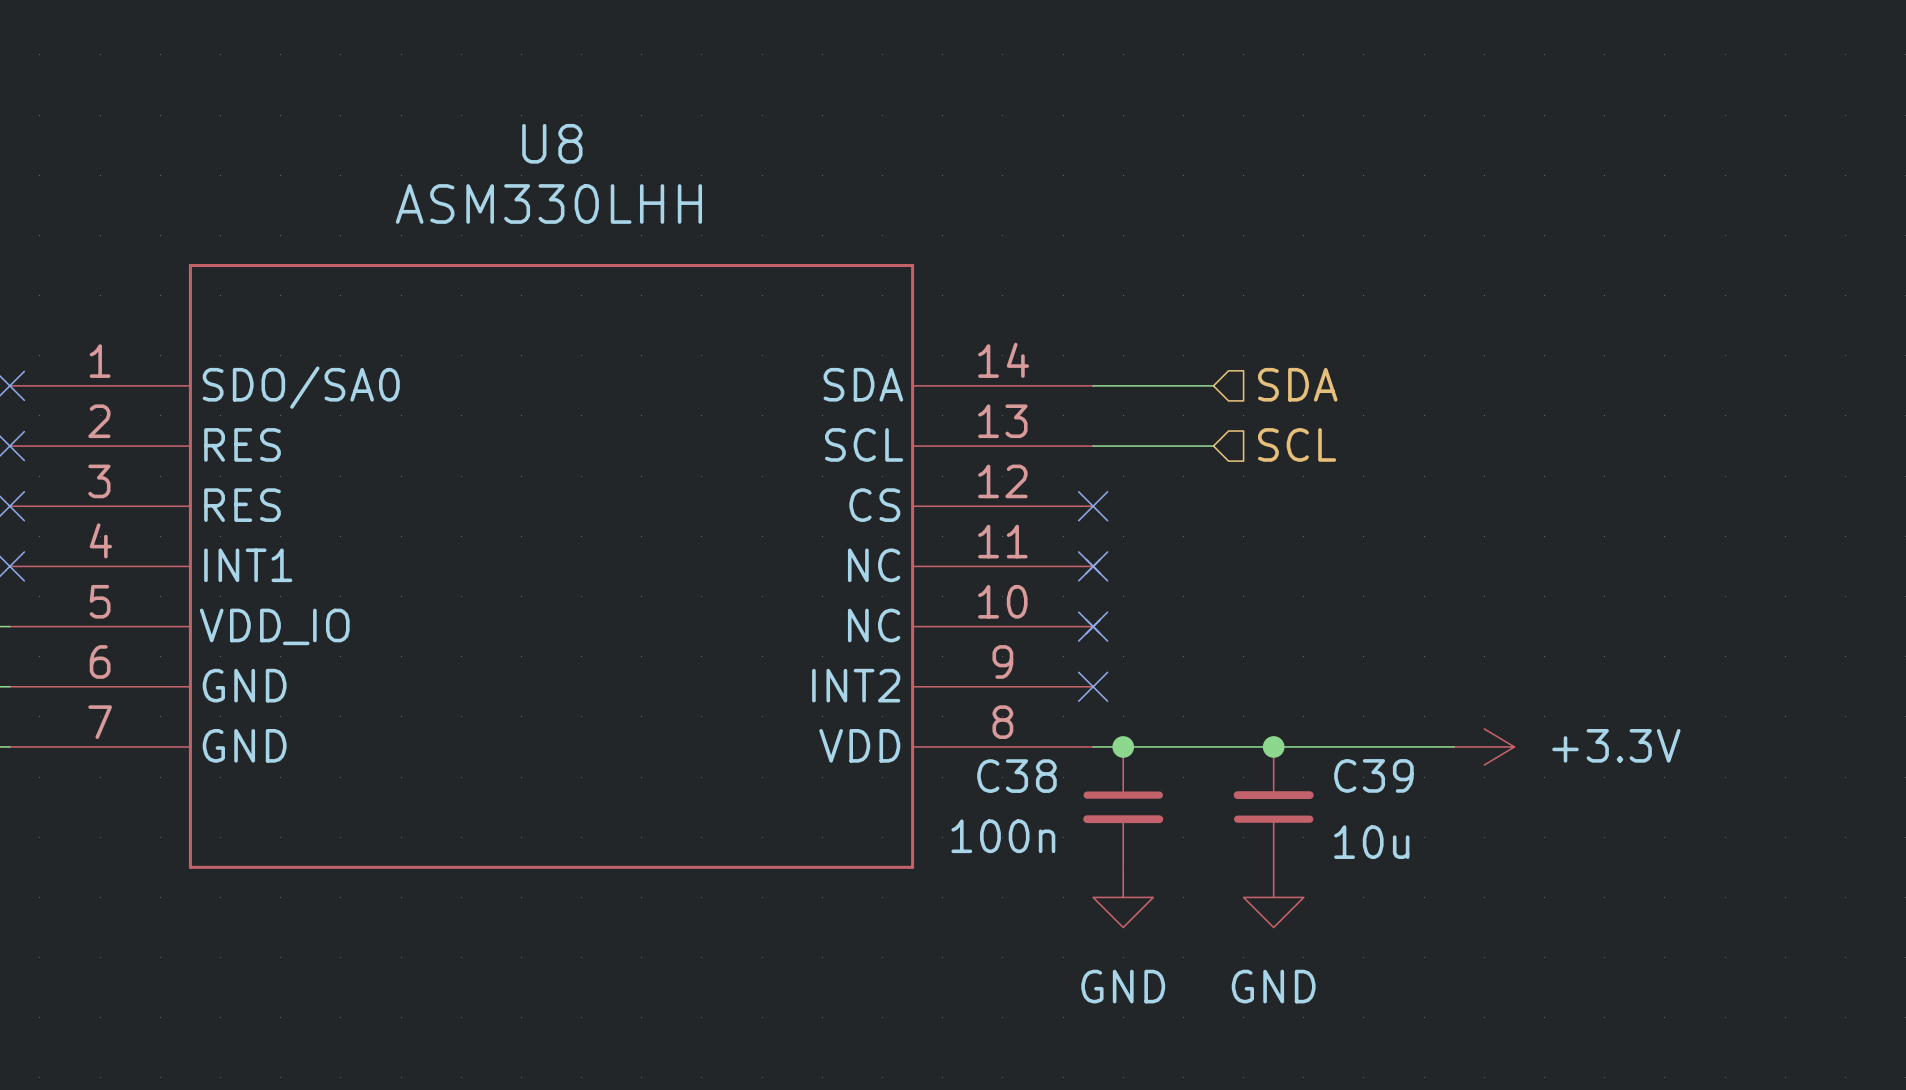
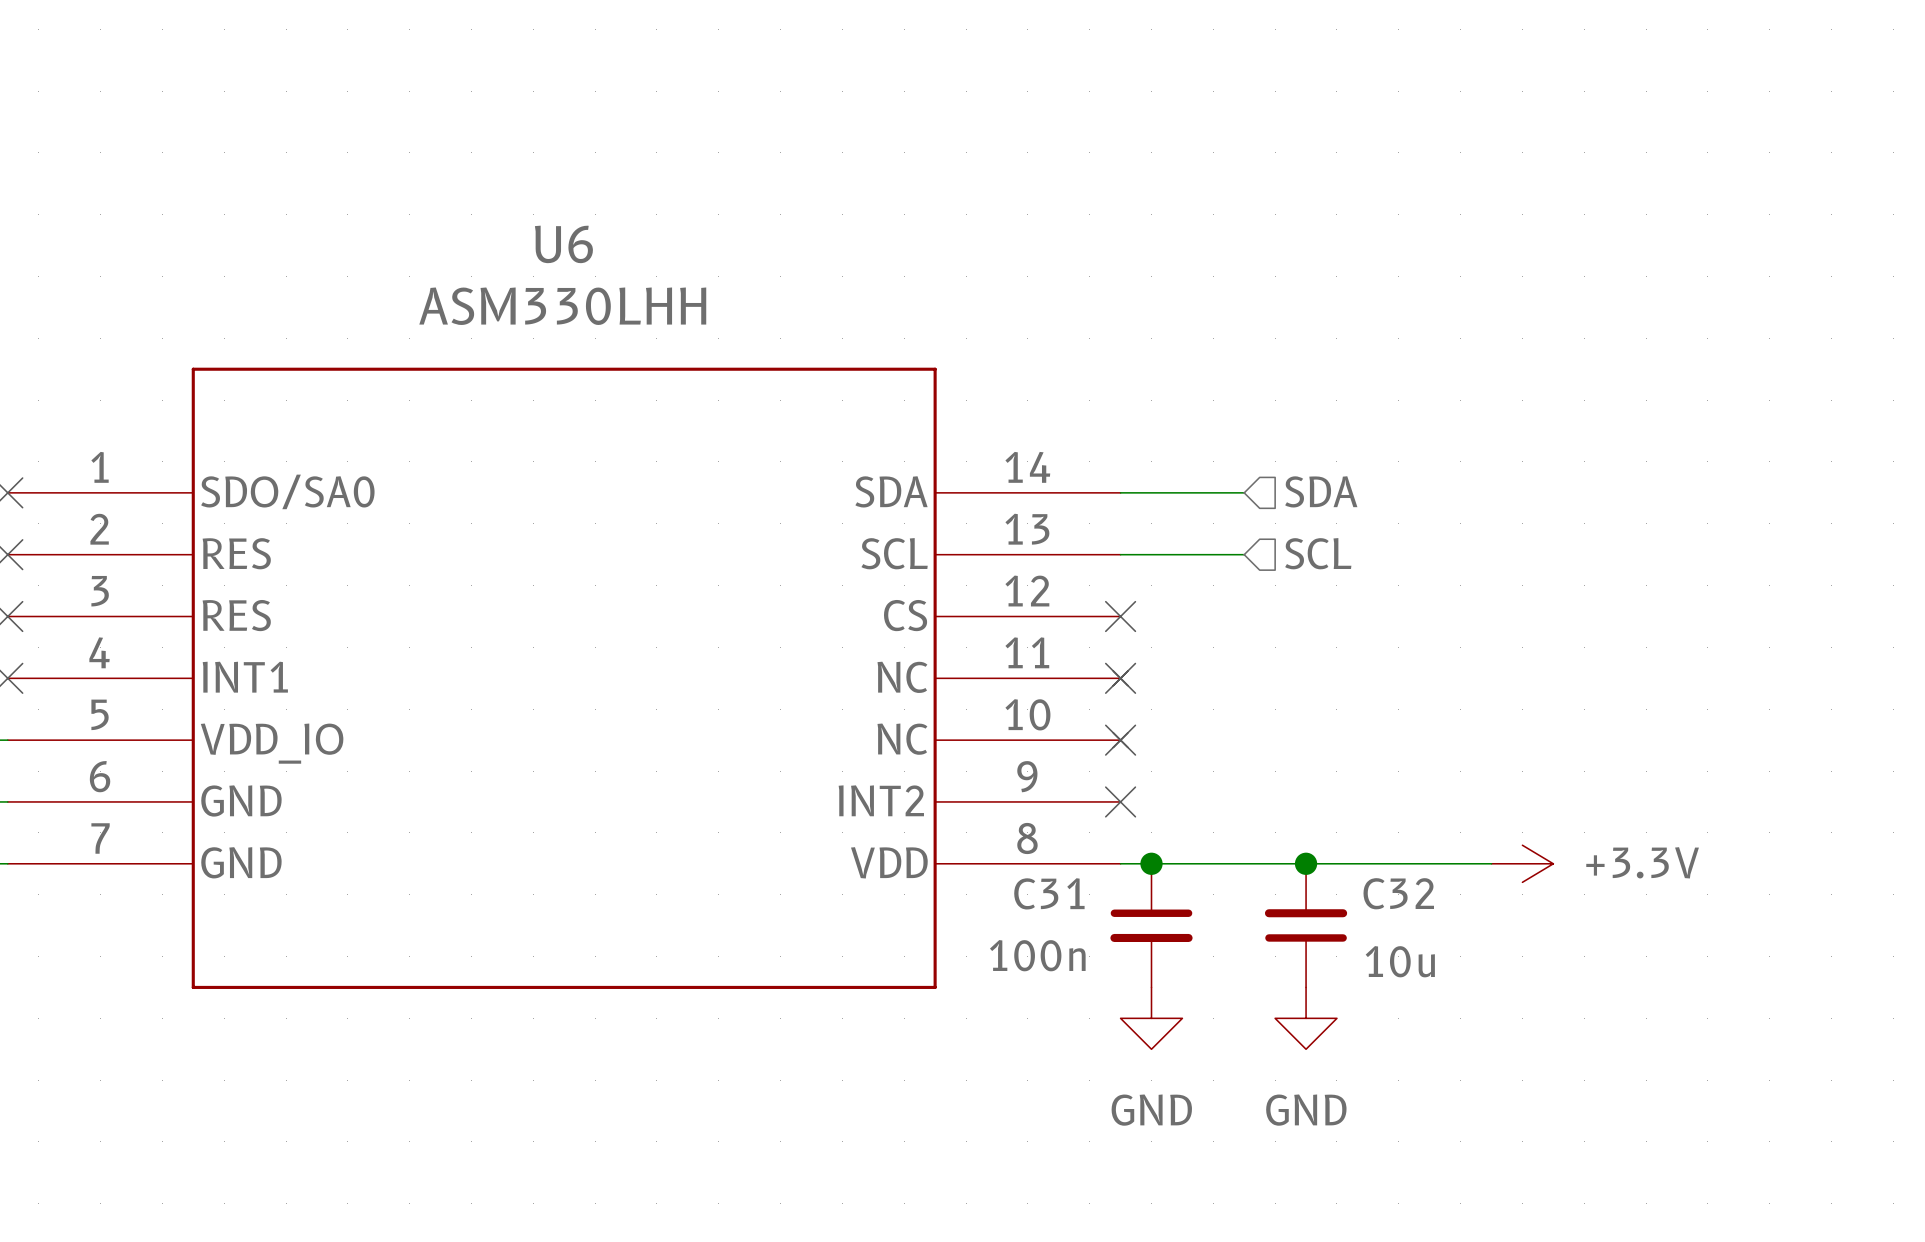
U8 name: U8 (552, 143) -> U6 (563, 244)
C39 name: C39 (1373, 775) -> C32 (1398, 893)
C38 name: C38 (1016, 776) -> C31 (1049, 893)

